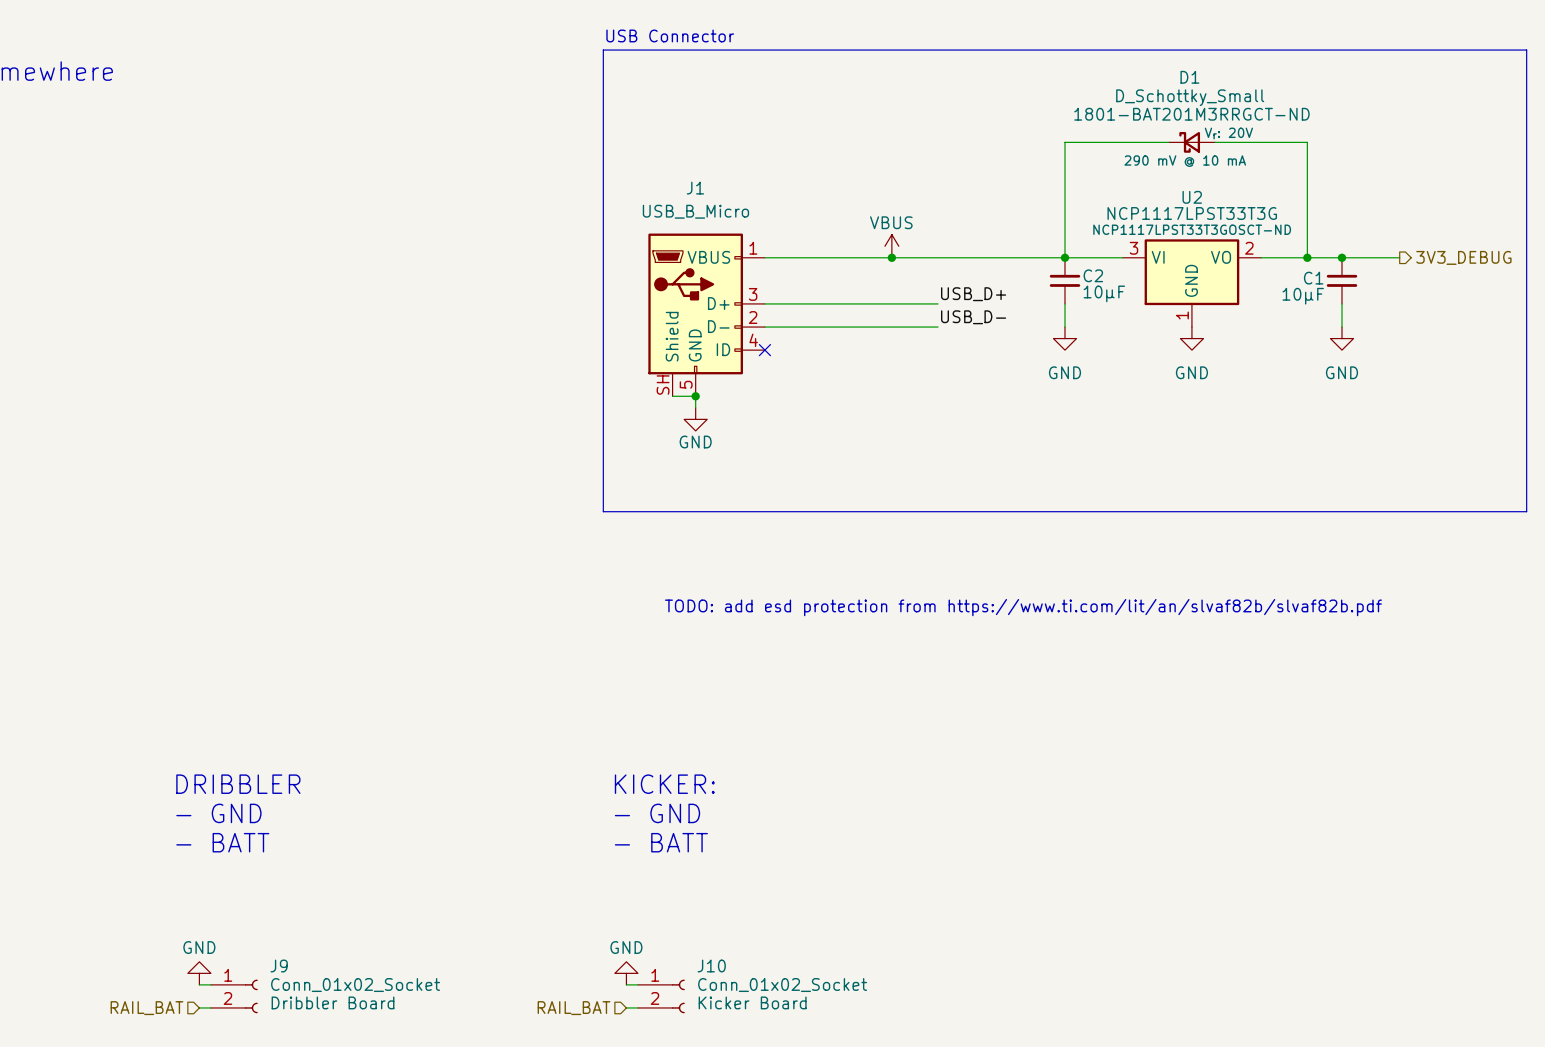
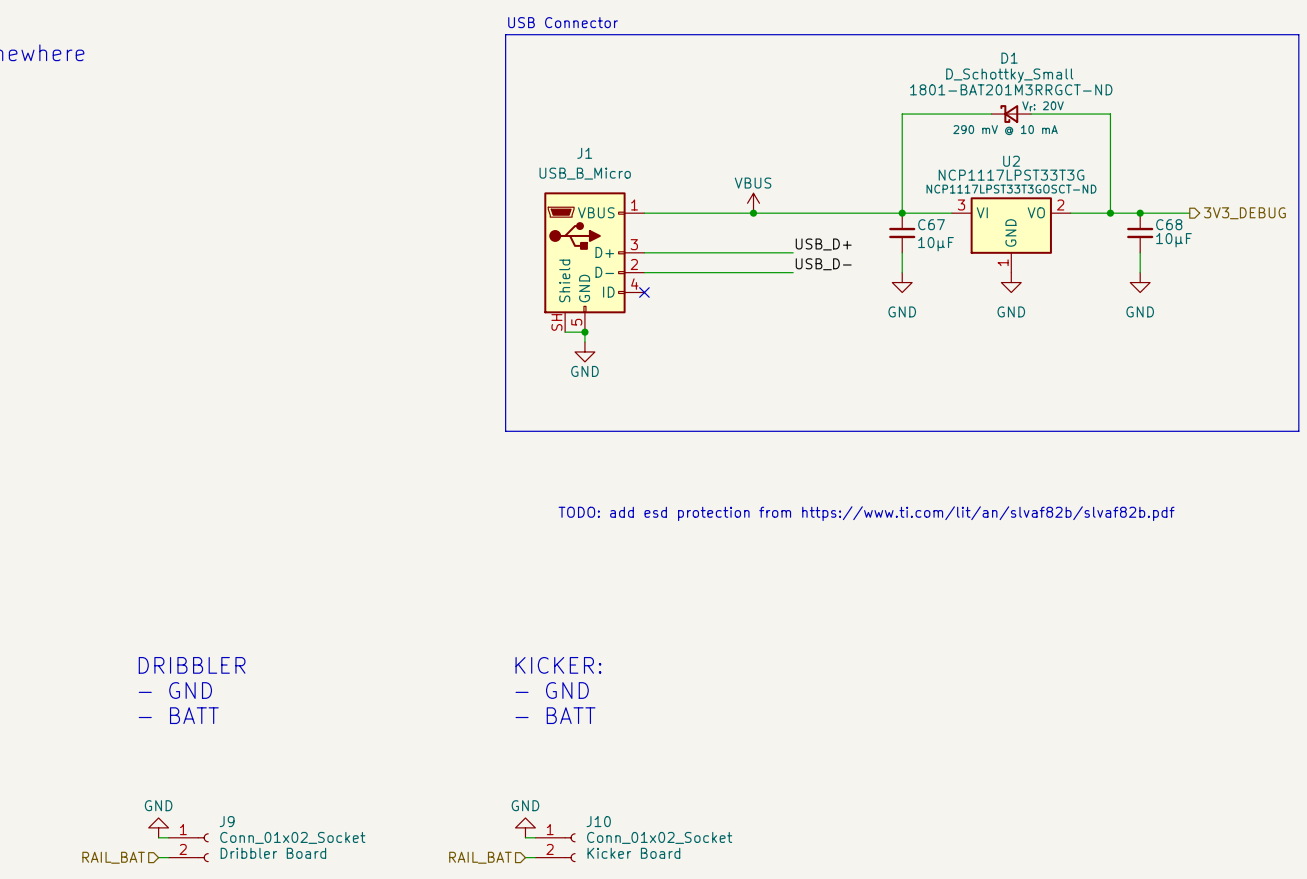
C2 name: C2 (1093, 275) -> C67 (931, 224)
C1 name: C1 (1313, 278) -> C68 (1169, 224)
C1 value position: 10µF (1303, 296) -> 10µF (1173, 240)

